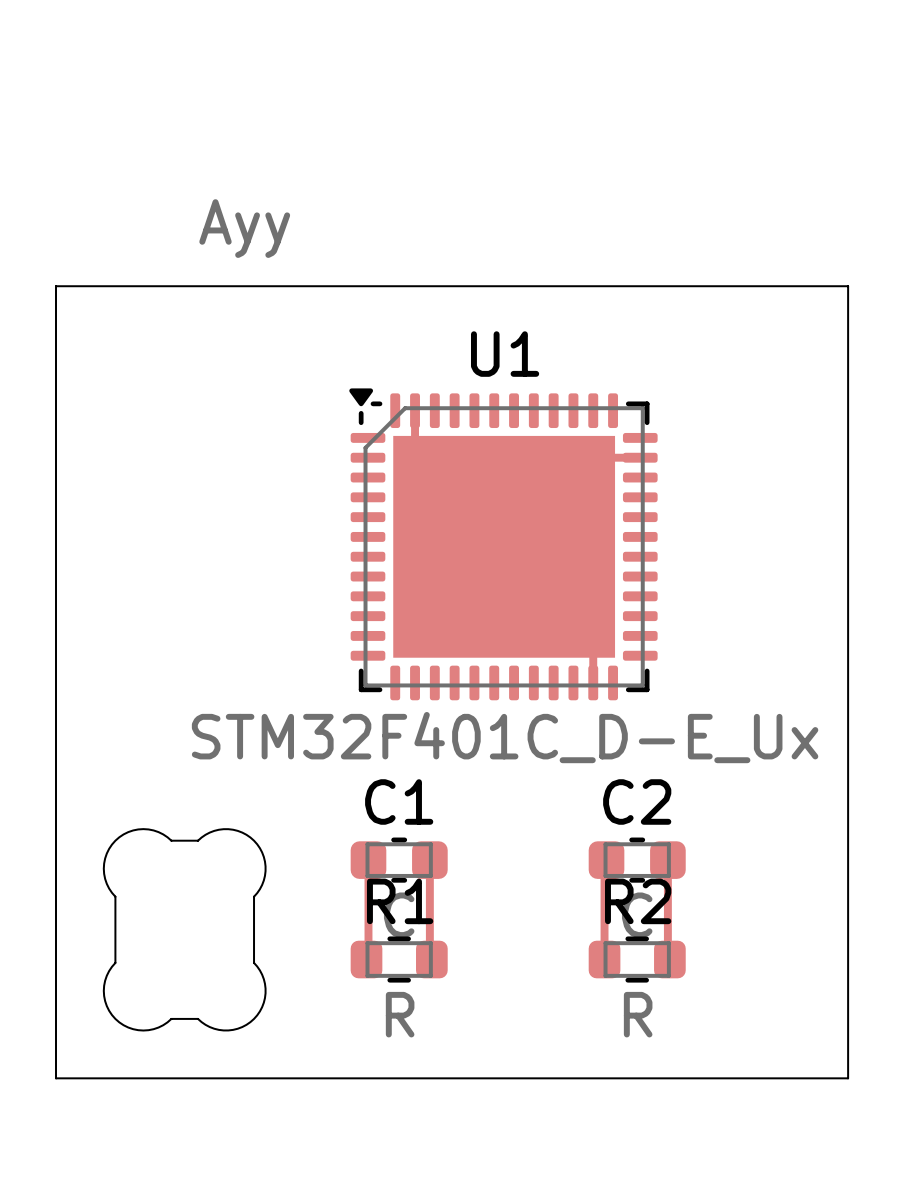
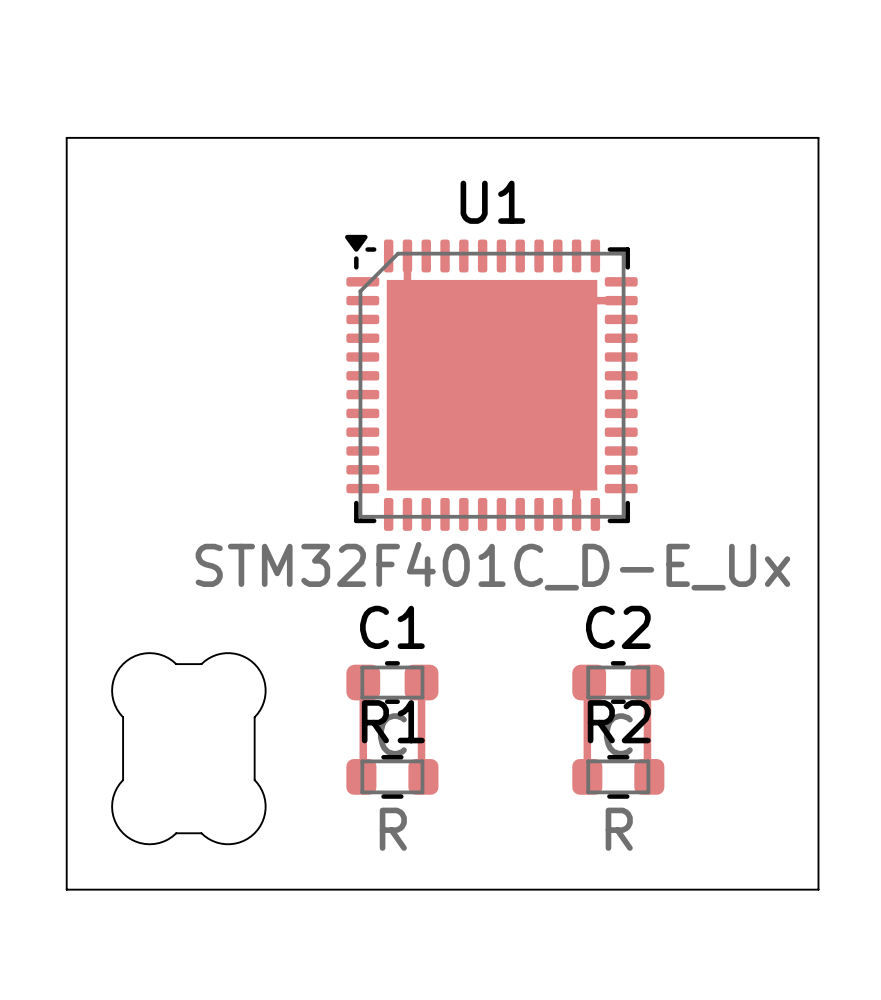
text: Ayy (244, 228) -> none

